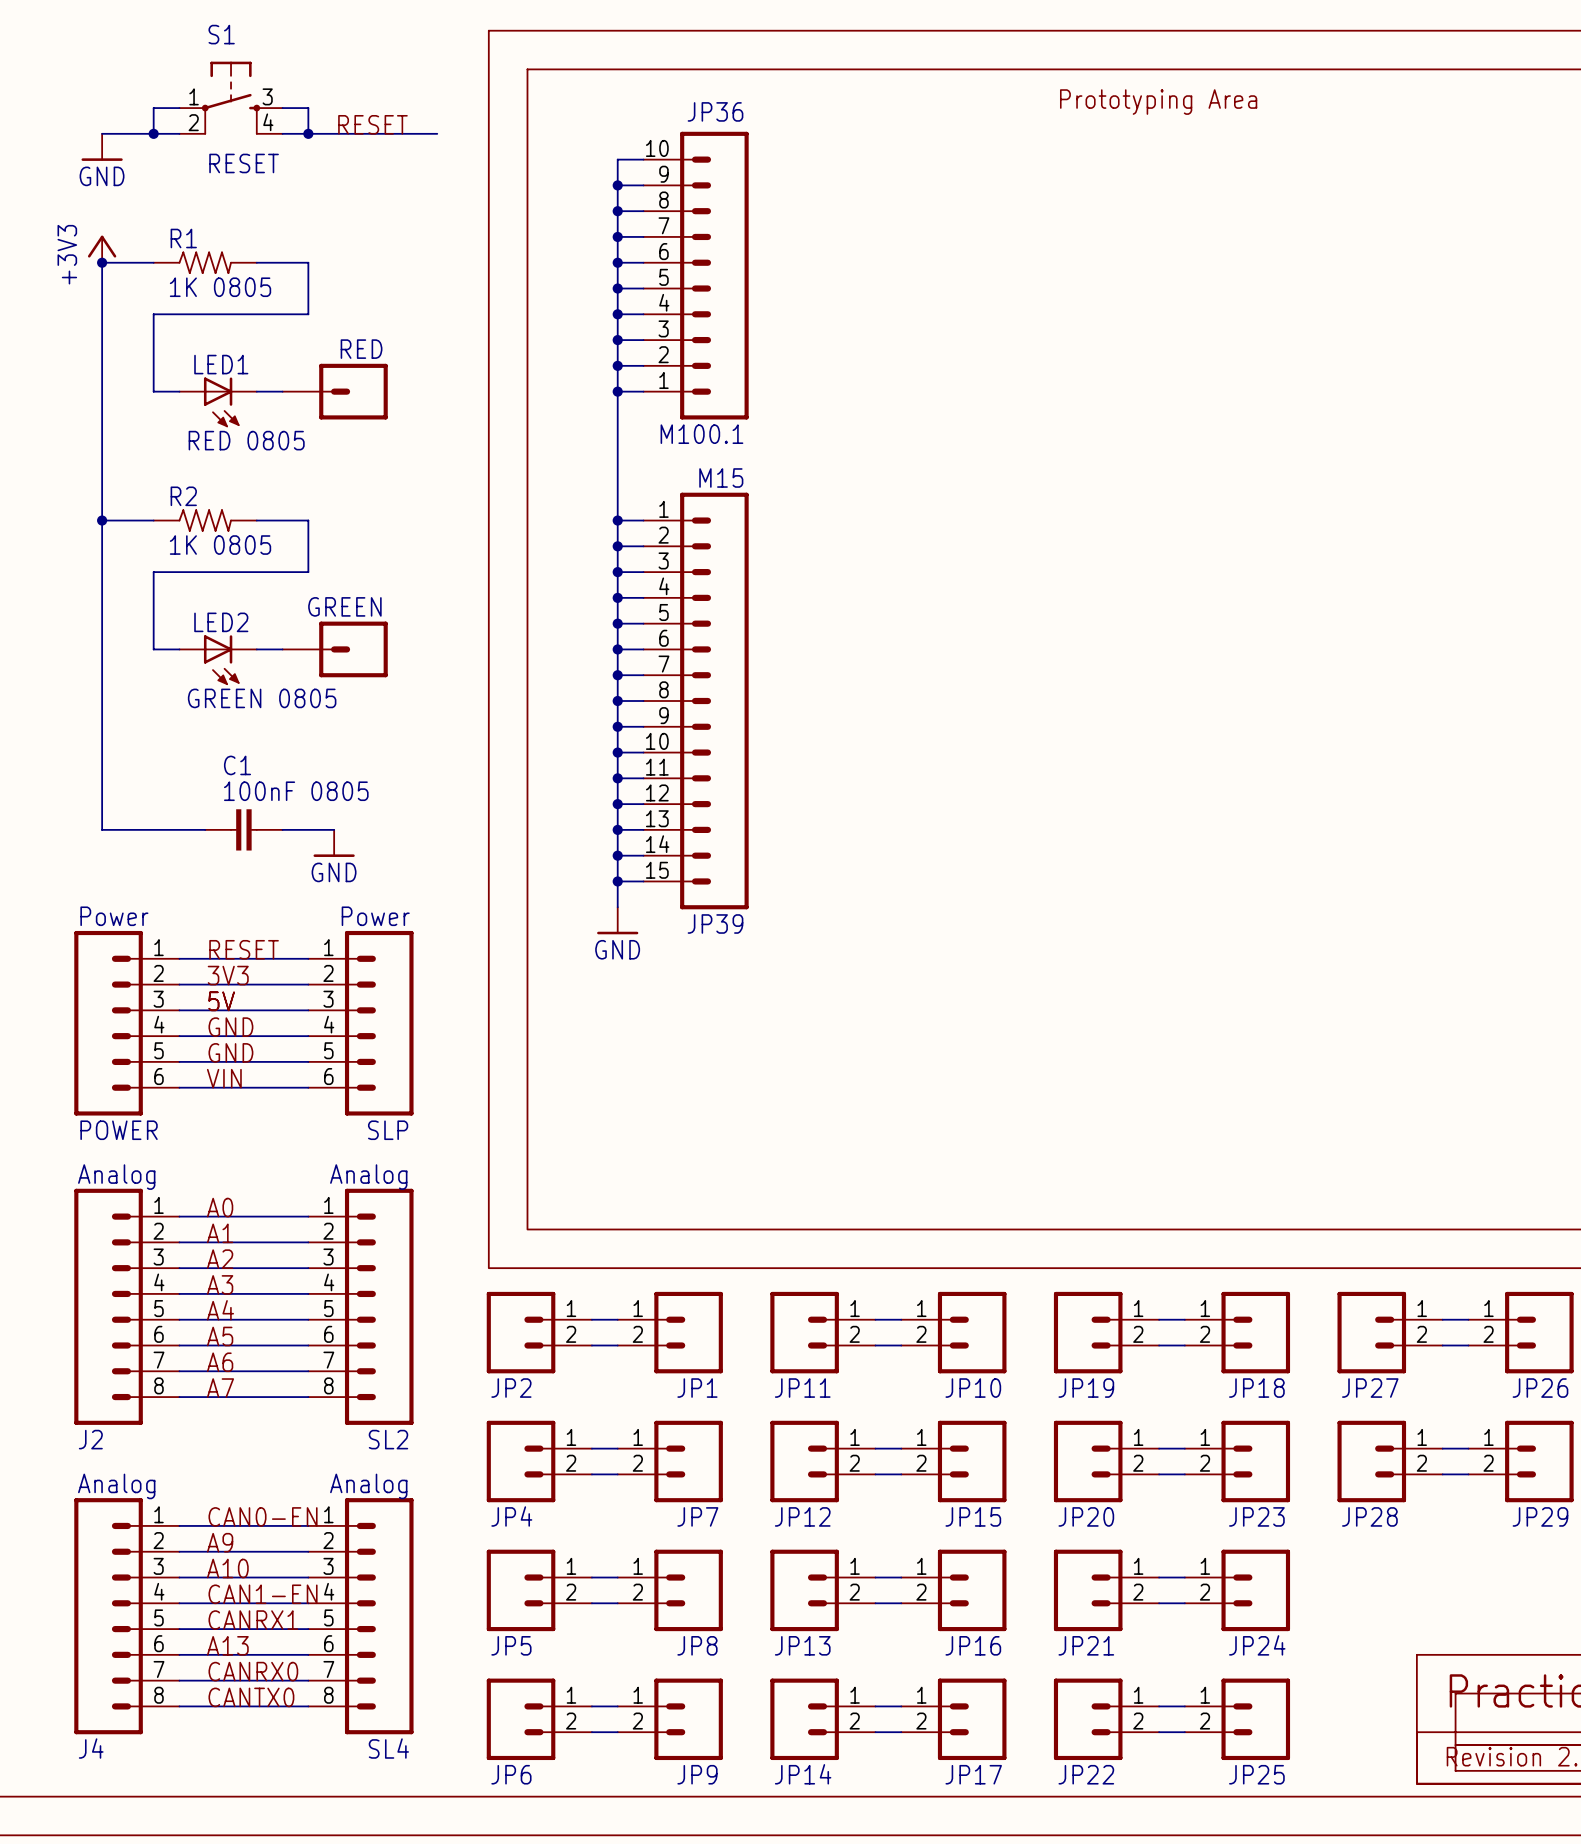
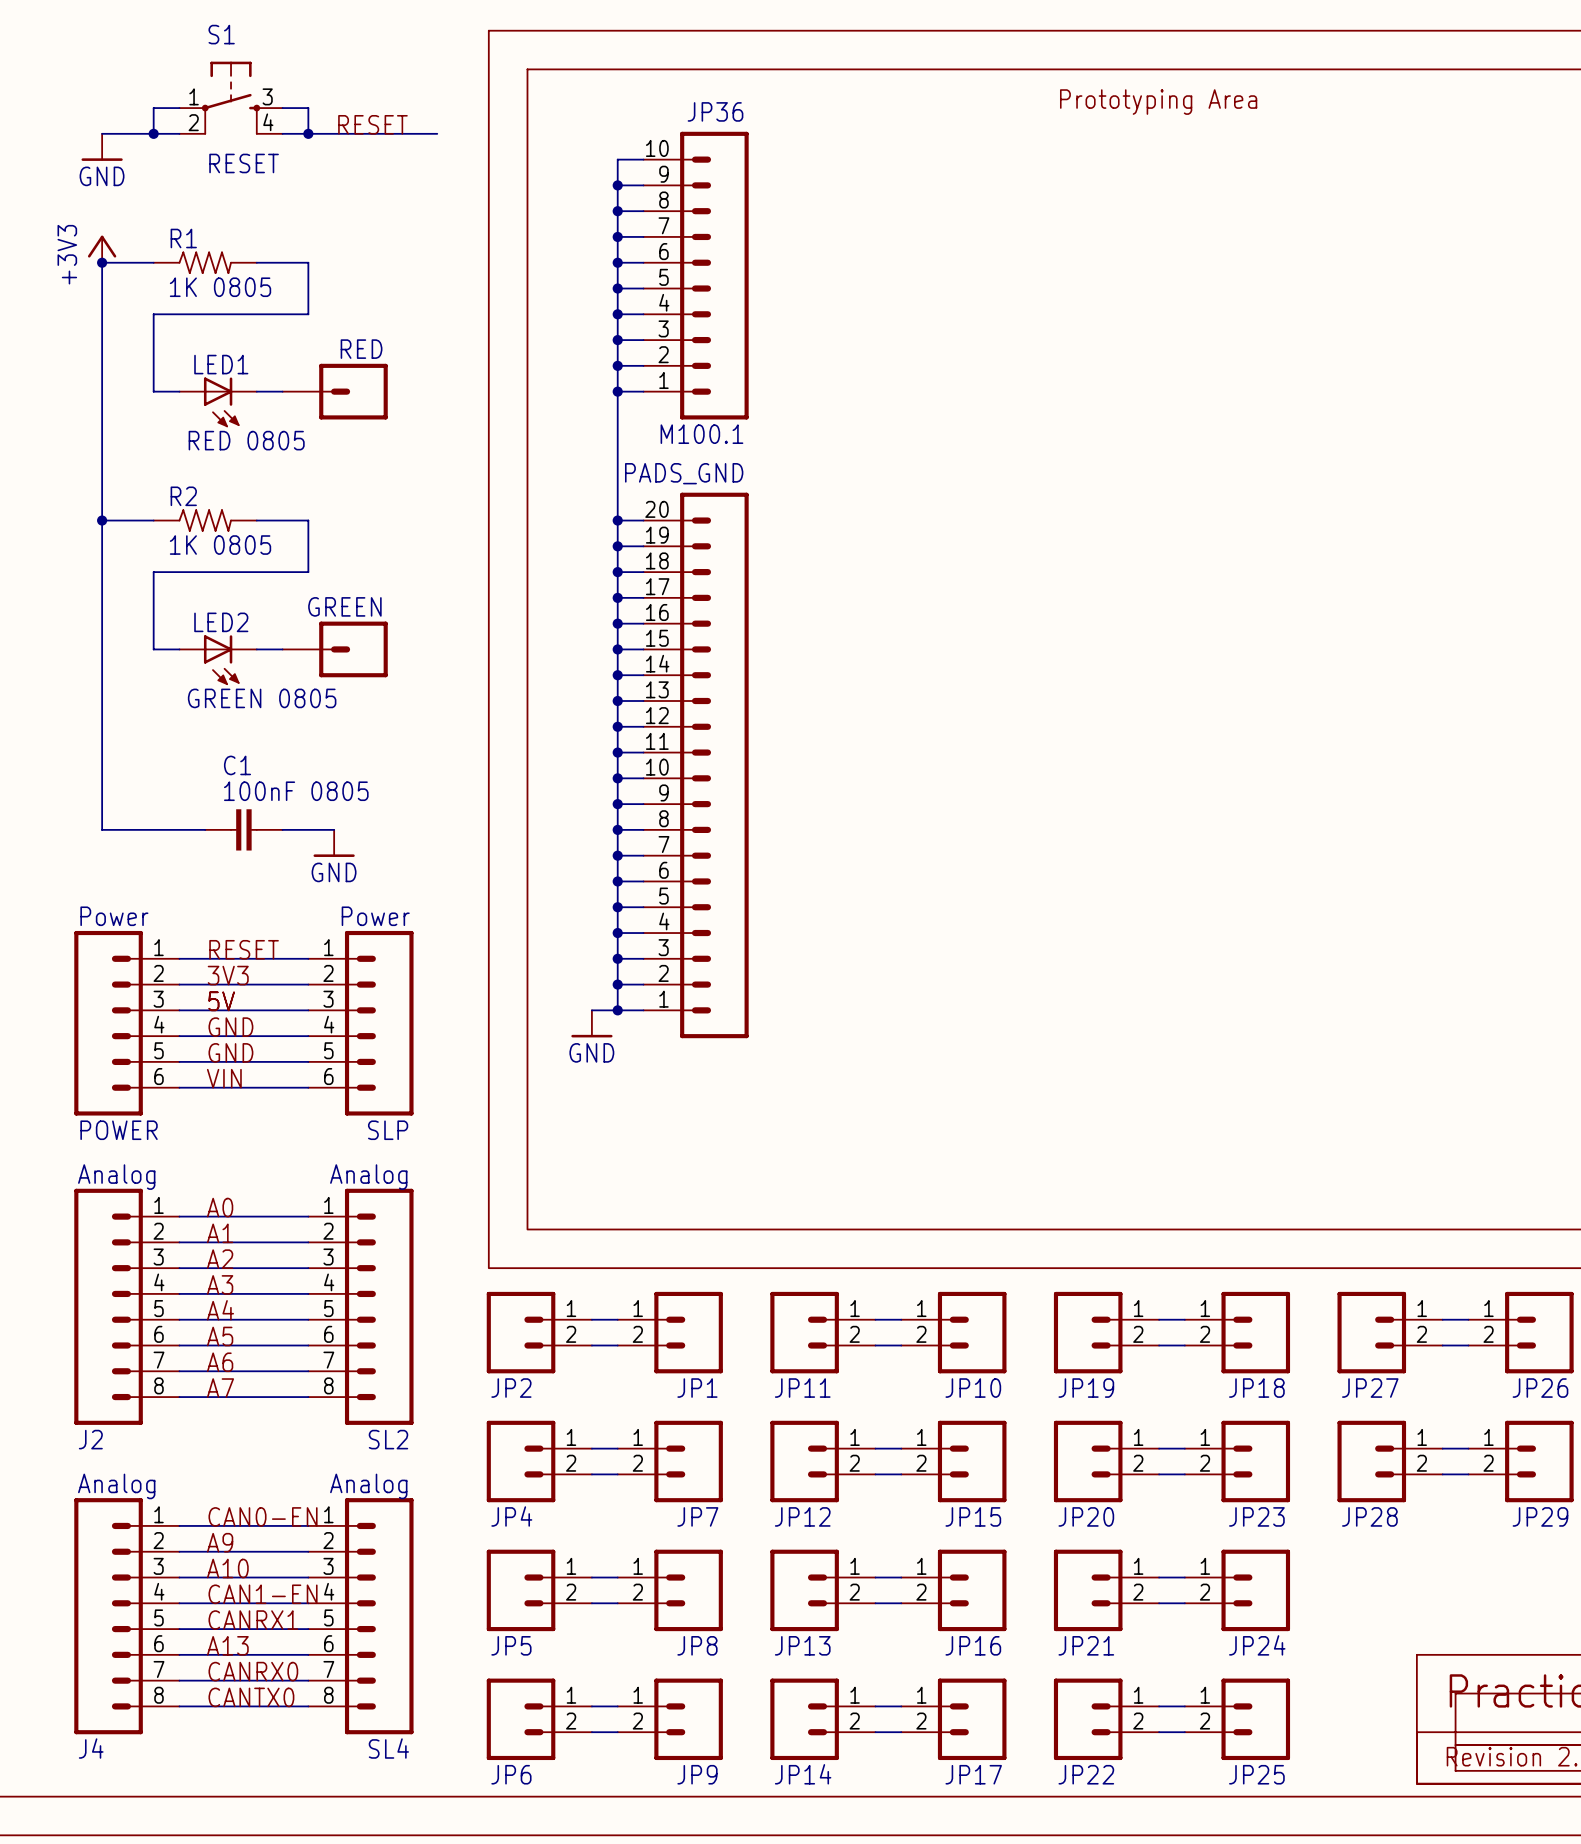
JP39: M15 (696, 701) -> none
PADS_GND: none -> (696, 765)
junction: none -> (617, 907)
wire: none -> (643, 907) (617, 907) (617, 1010)
power symbol position: GND (617, 920) -> GND (591, 1023)
junction: none -> (617, 933)
wire: none -> (617, 958) (643, 958)
junction: none -> (617, 958)
wire: none -> (617, 984) (643, 984)
junction: none -> (617, 984)
wire: none -> (591, 1010) (643, 1010)
junction: none -> (617, 1010)

